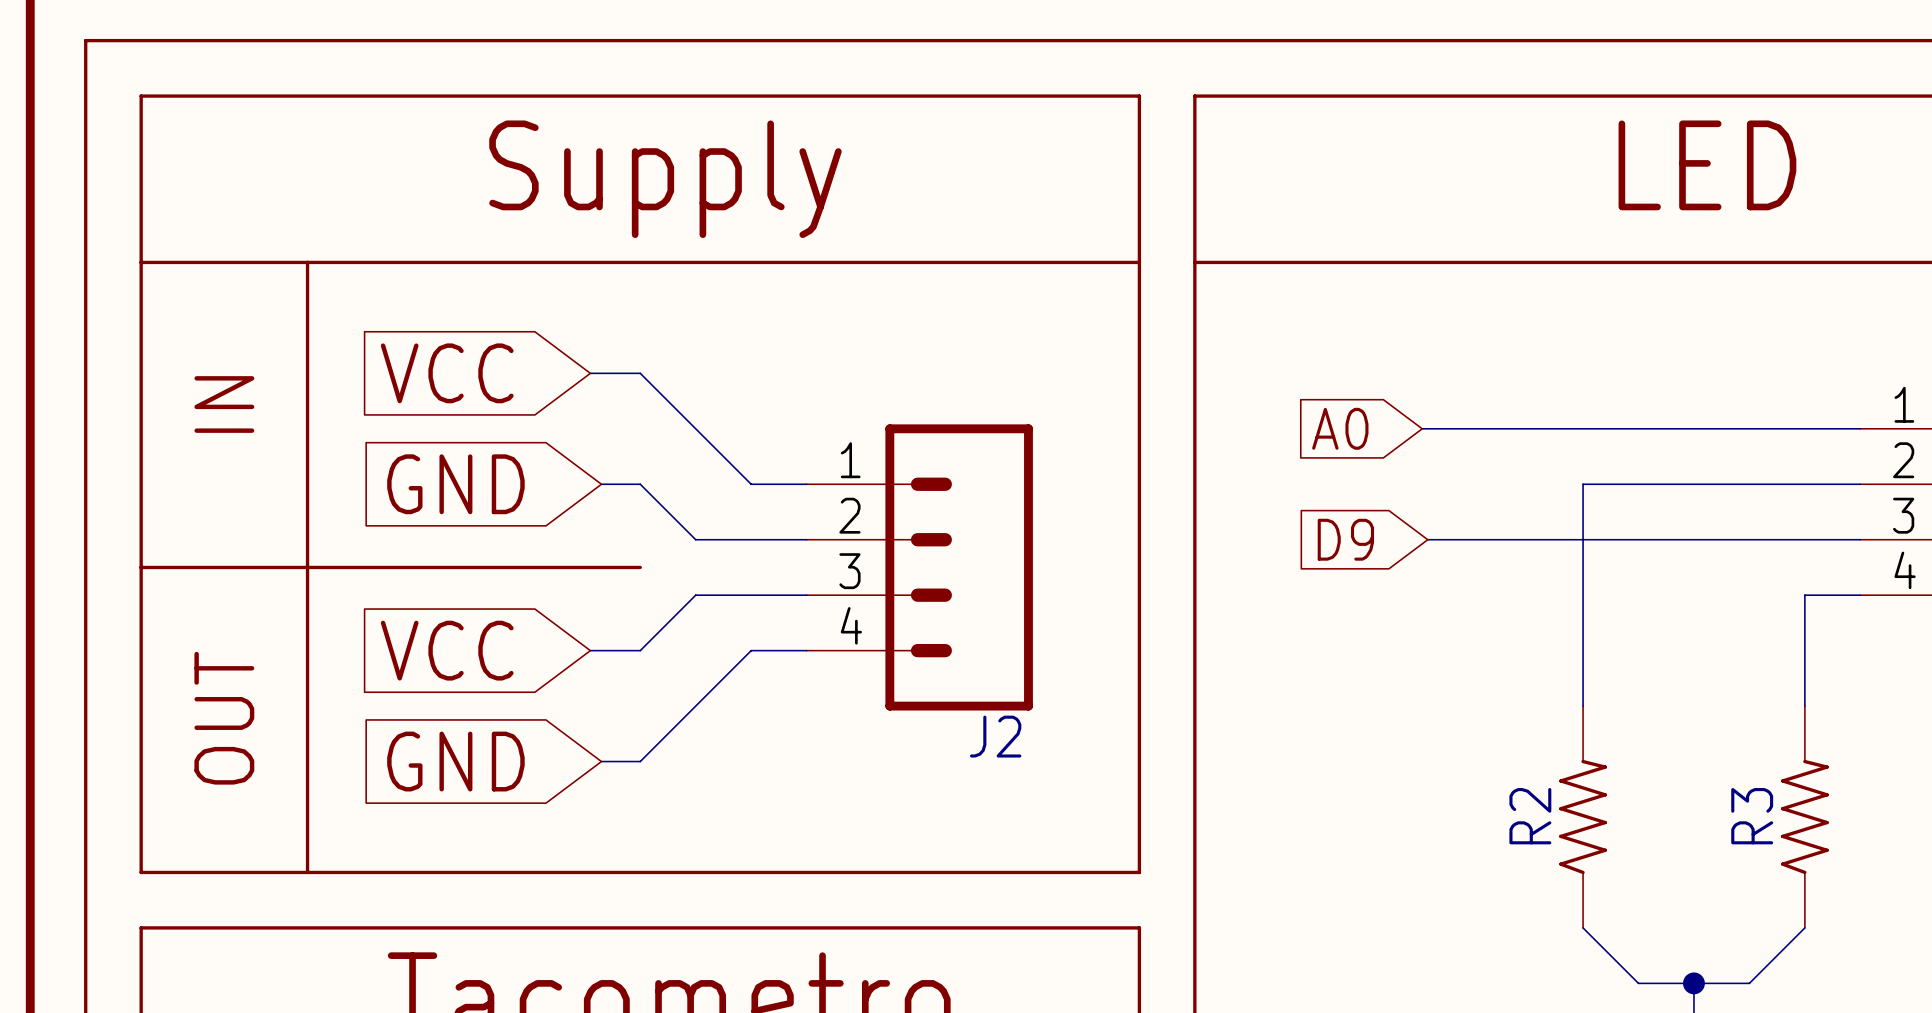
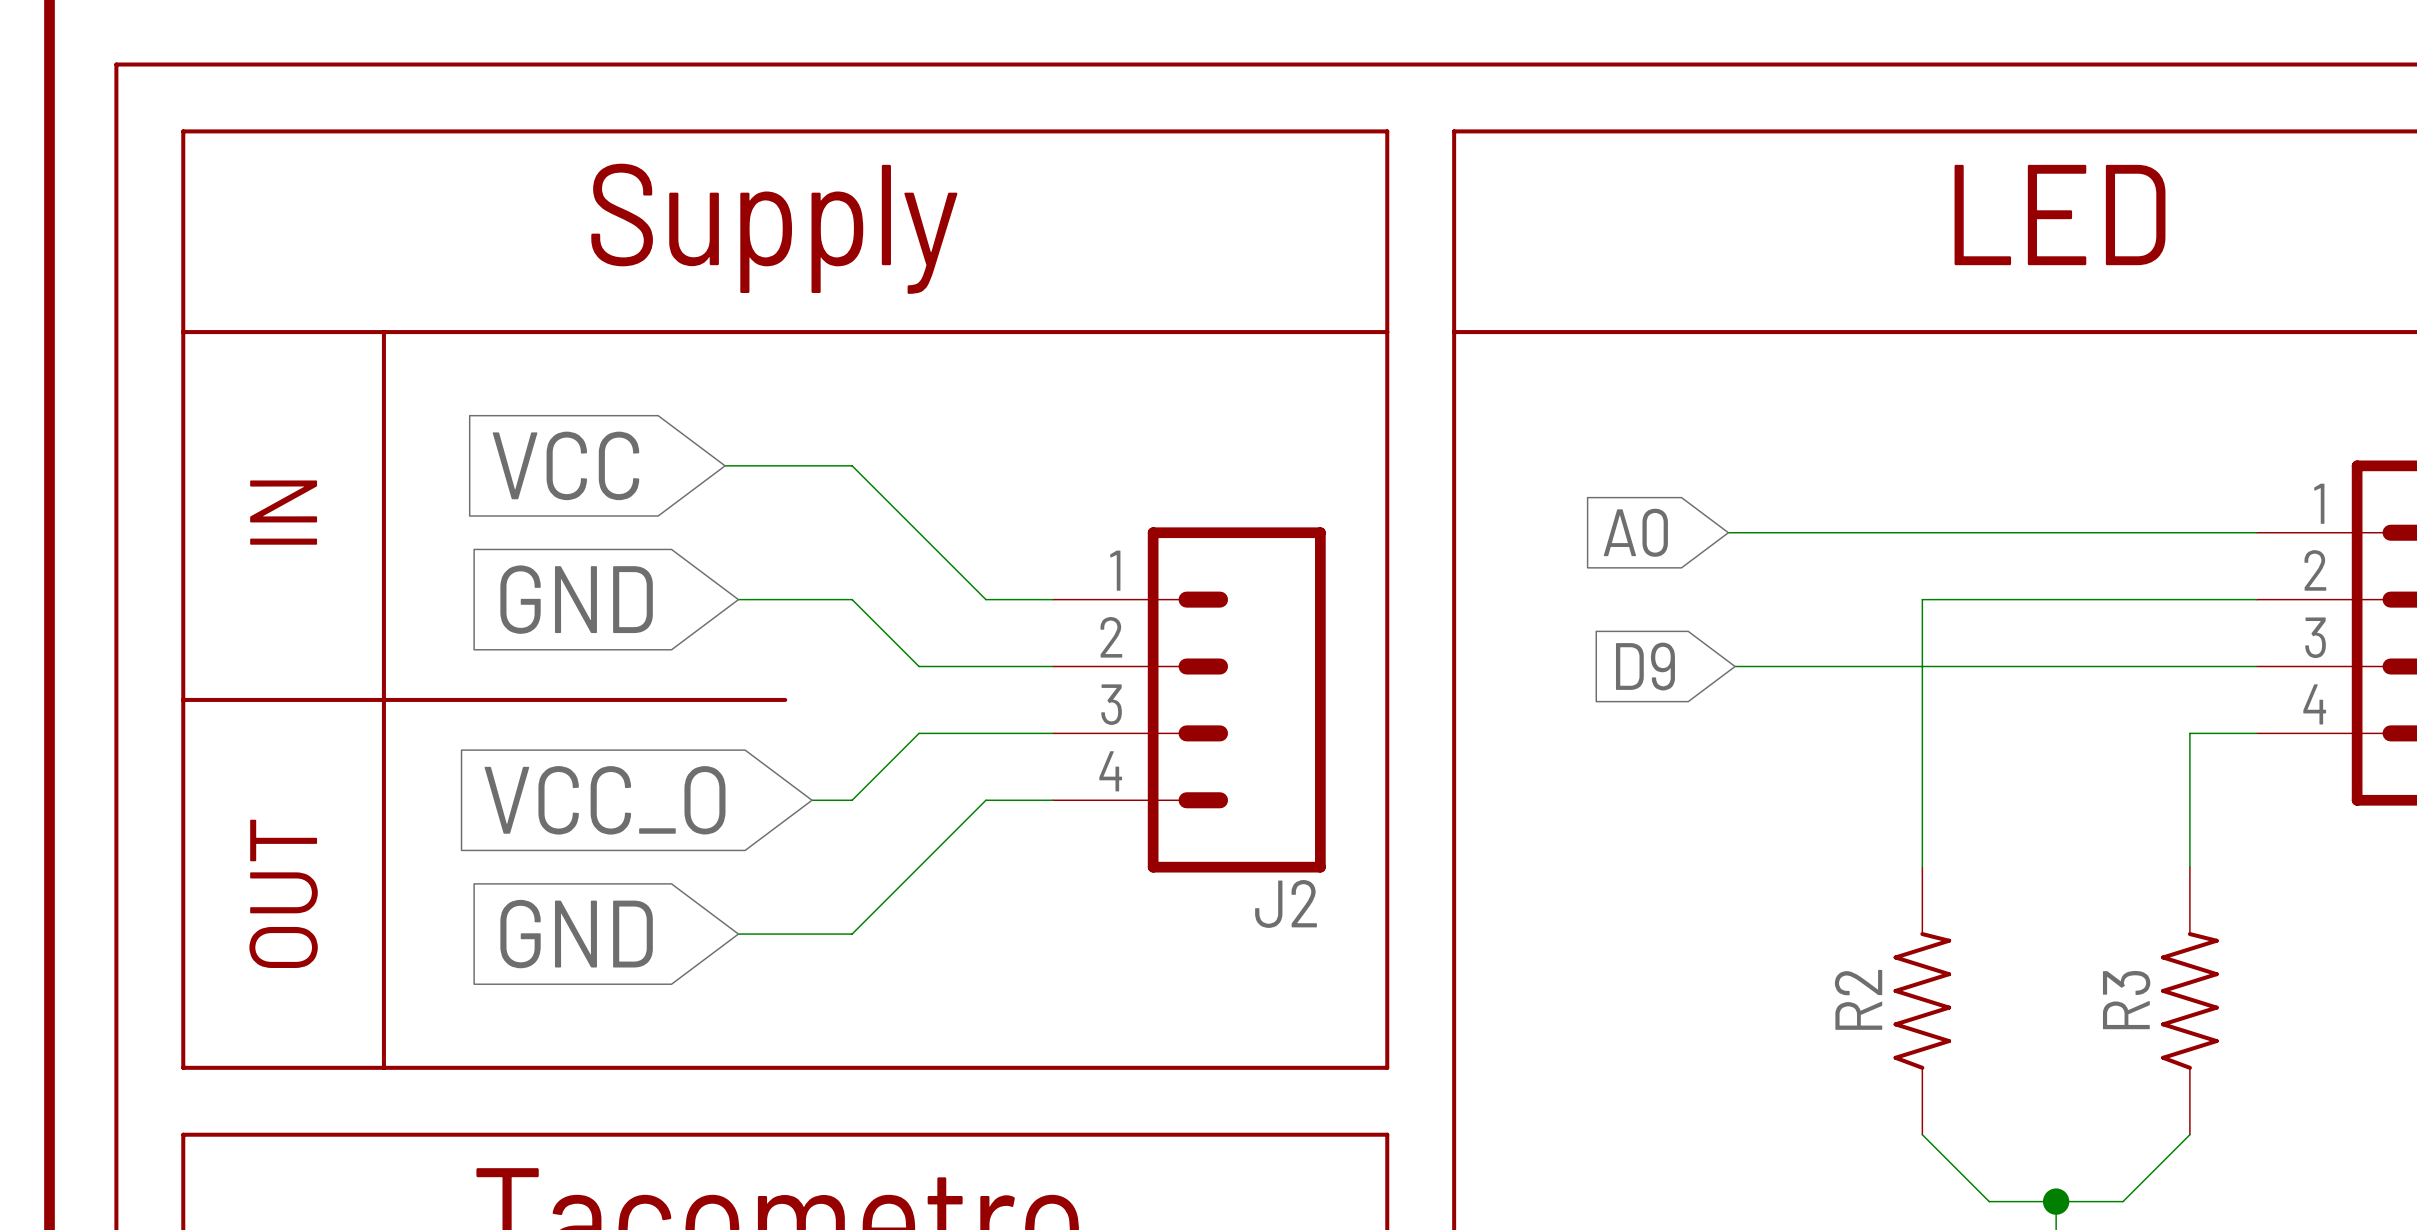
wire: (640, 373) (751, 484) (806, 484) -> (785, 465) (852, 465) (985, 599) (1052, 599)
wire: (640, 484) (695, 539) (751, 539) -> (785, 599) (852, 599) (919, 666)
J2 position: (919, 567) -> (1189, 699)
wire: (751, 595) (695, 595) (640, 650) (590, 650) -> (919, 733) (852, 800) (812, 800)
global label: VCC (447, 650) -> VCC_O (605, 800)
wire: (806, 650) (751, 650) (640, 761) -> (1052, 800) (985, 800) (852, 934) (785, 934)

